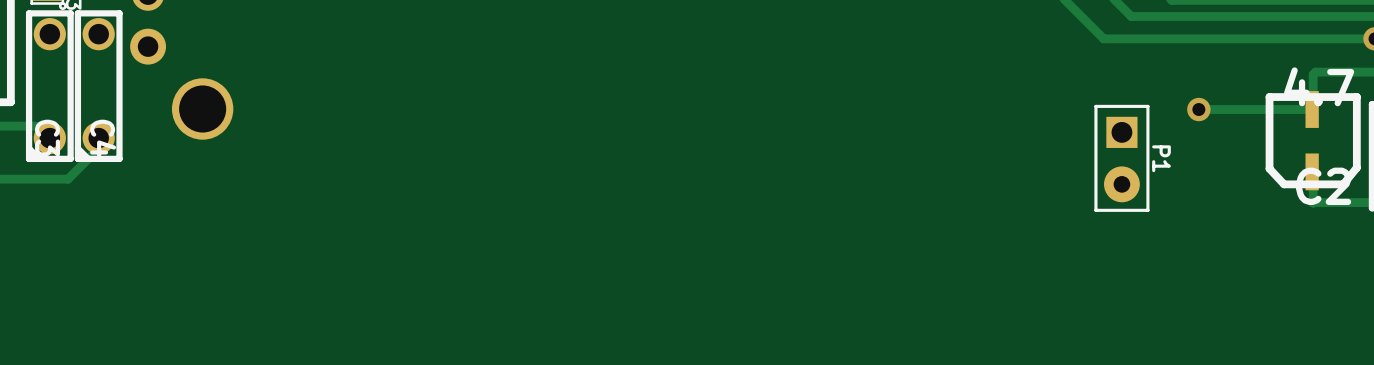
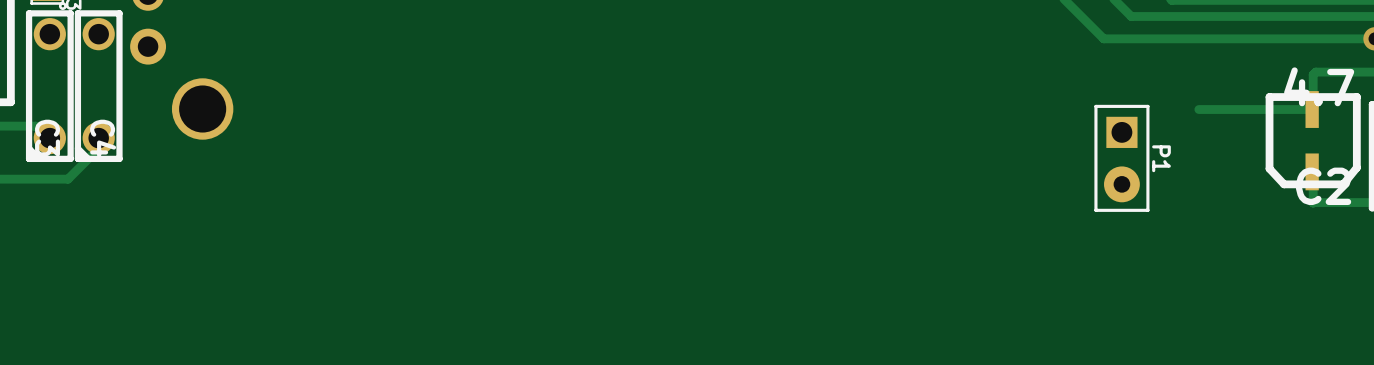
via: (1198, 109) -> none

